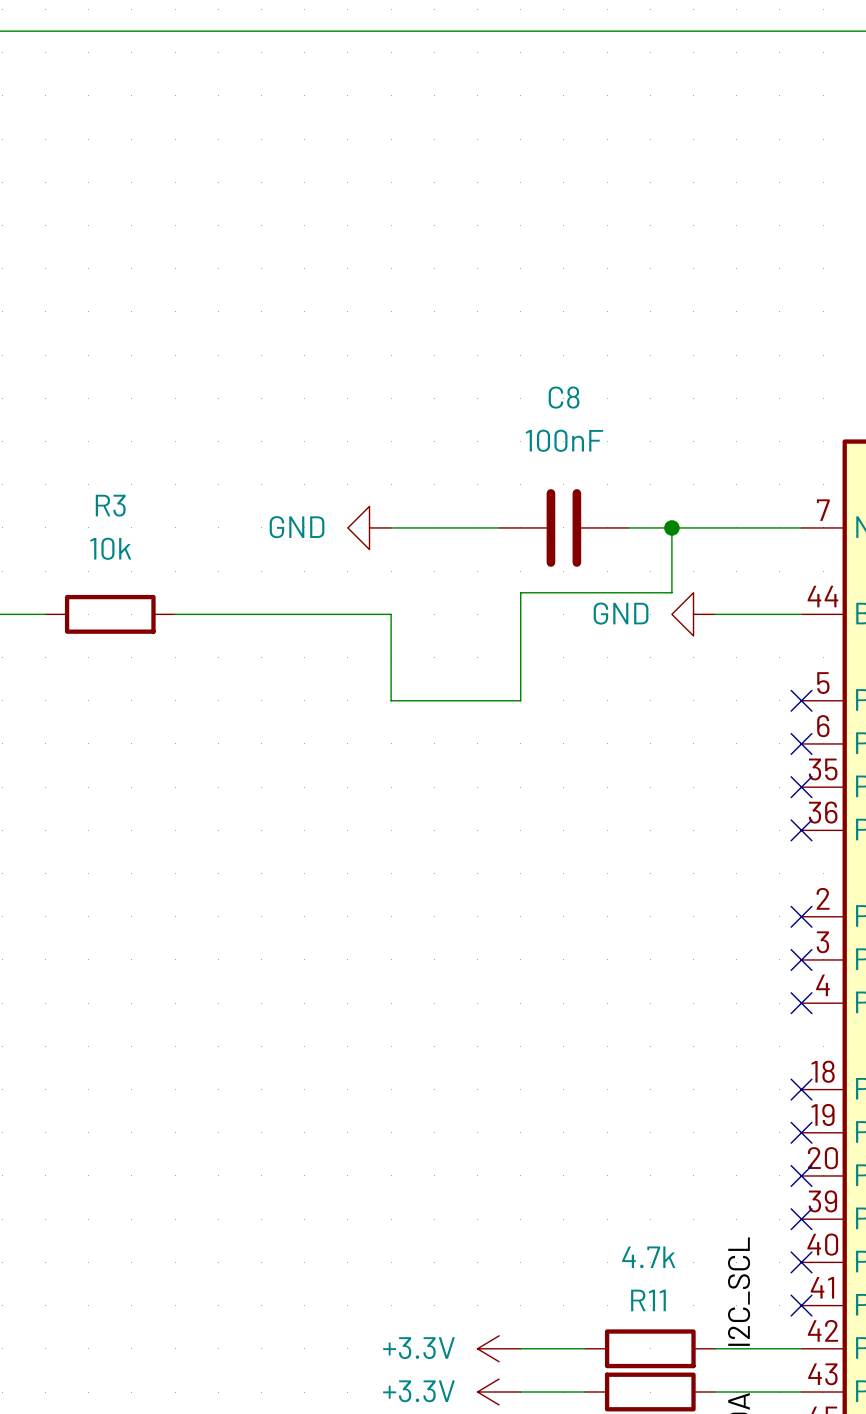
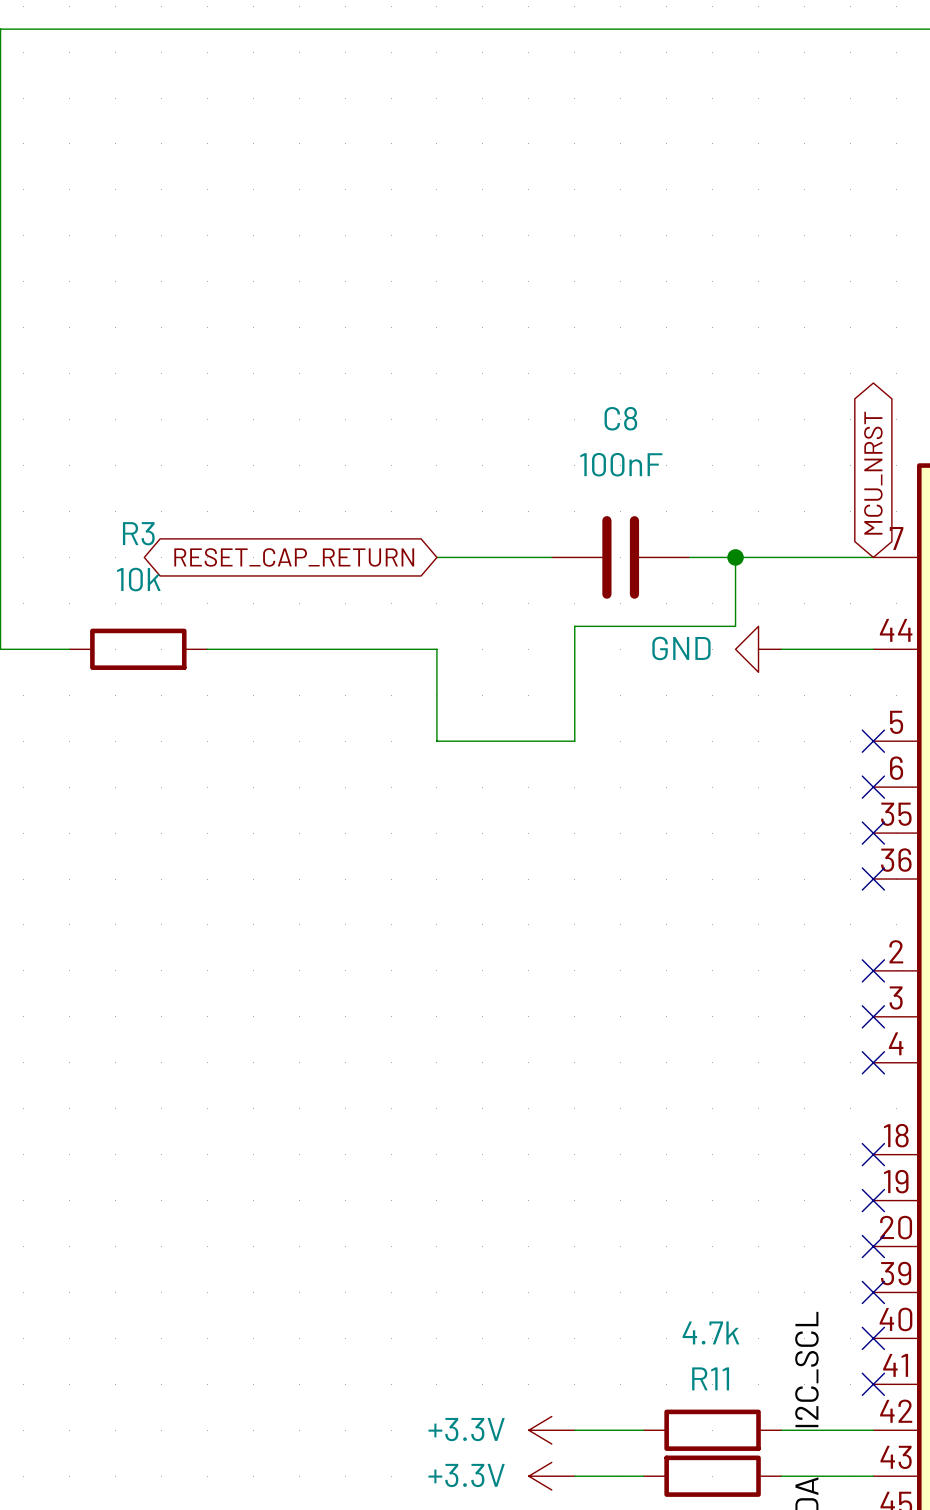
global label: none -> MCU_NRST (873, 473)
global label: none -> RESET_CAP_RETURN (294, 557)
power symbol: GND (369, 527) -> none

